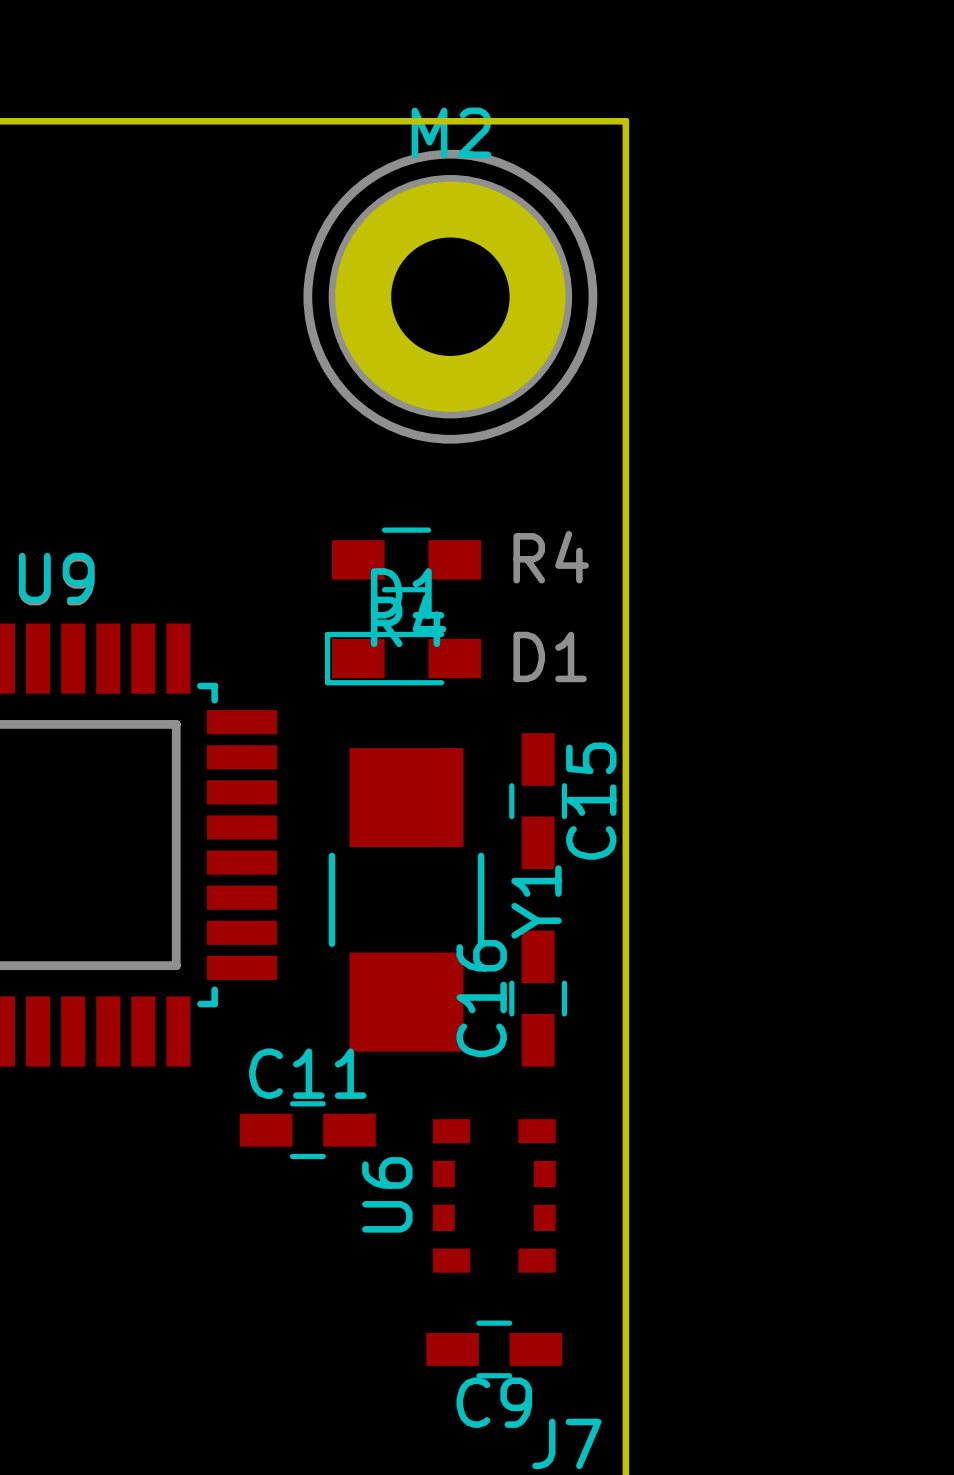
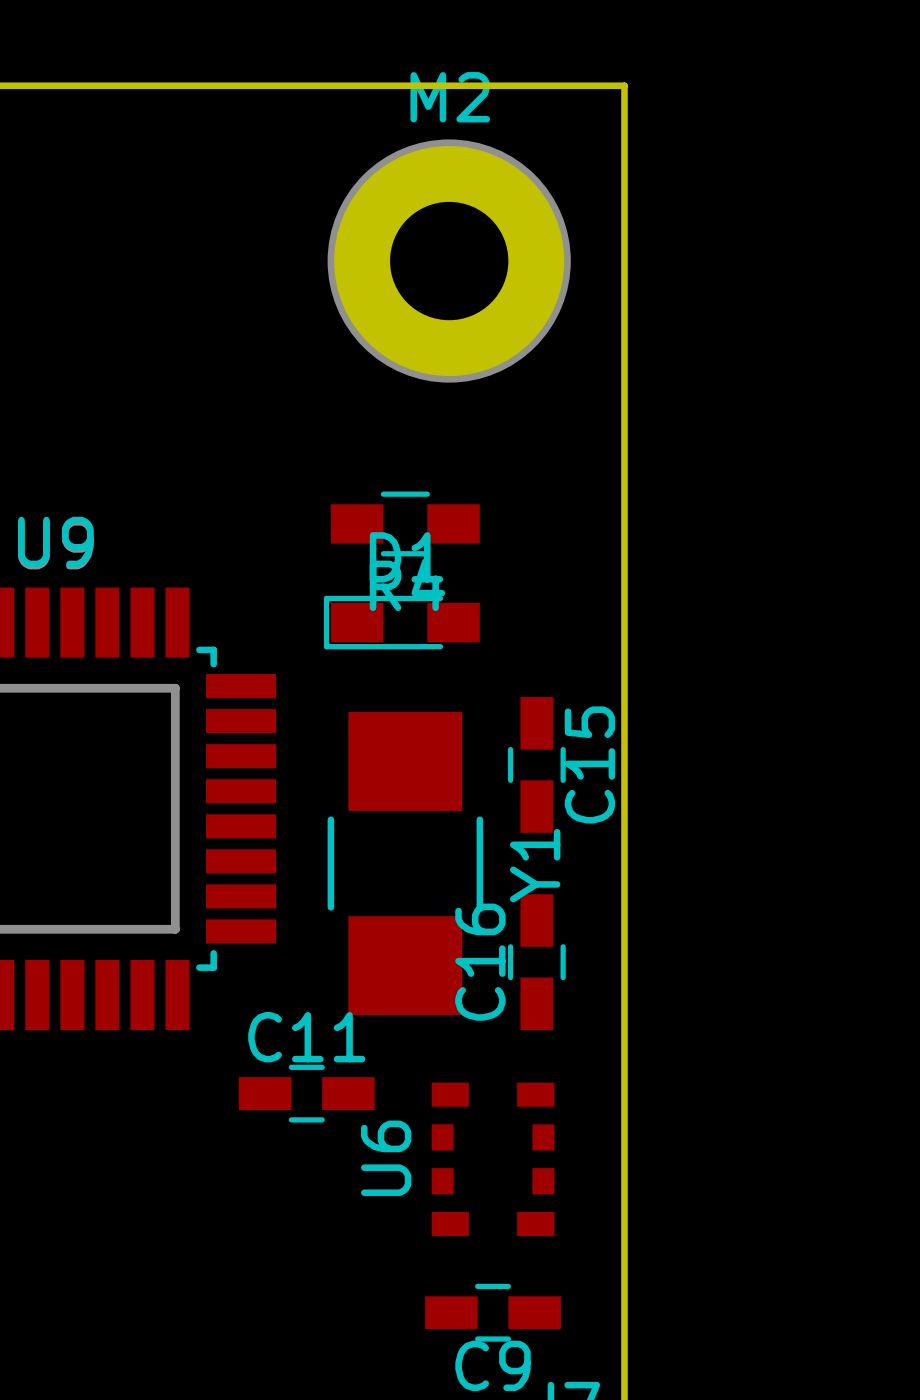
drawing: [303, 149, 598, 444] -> none
text: R4 (551, 557) -> none
text: D1 (550, 656) -> none

